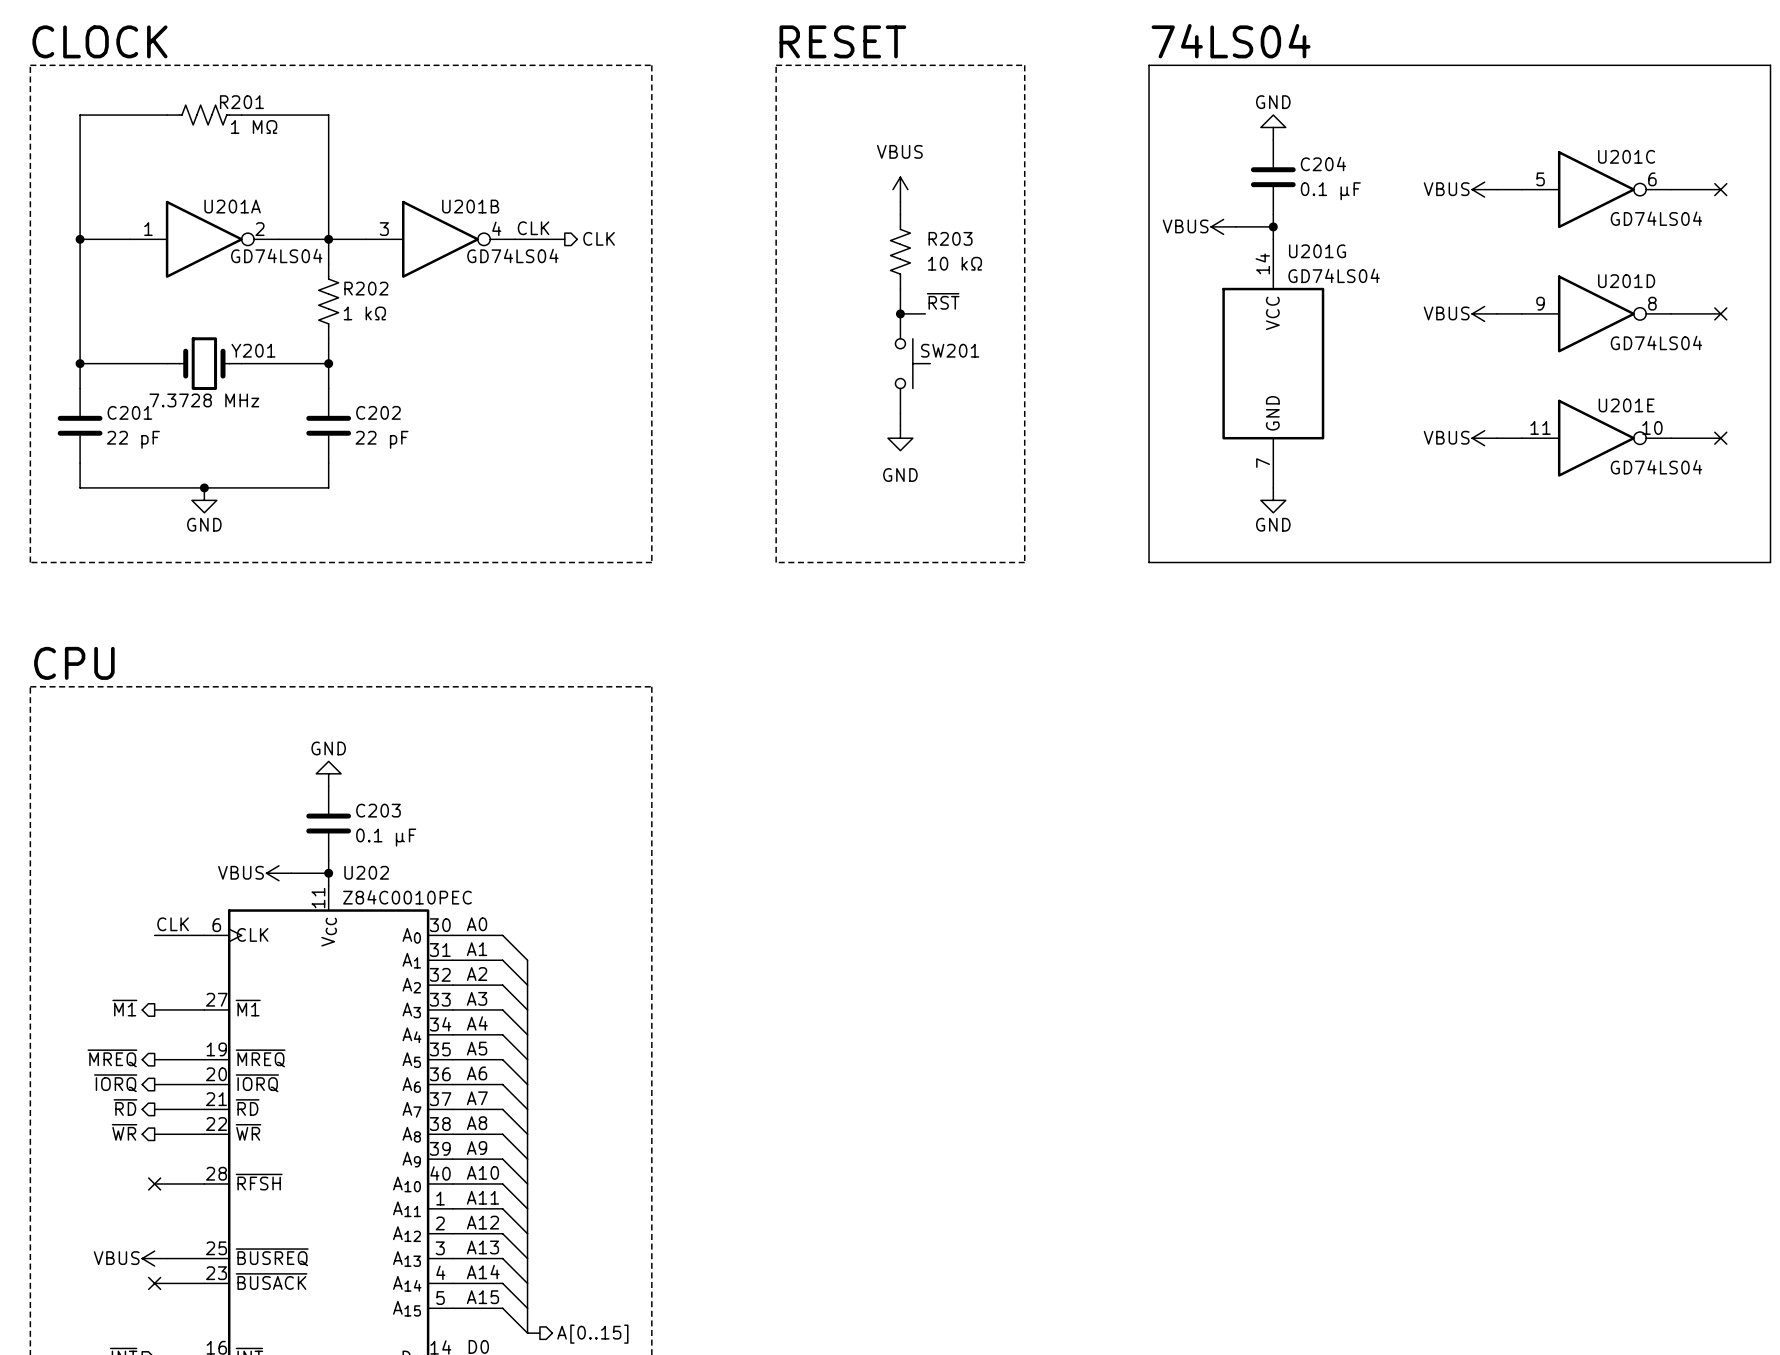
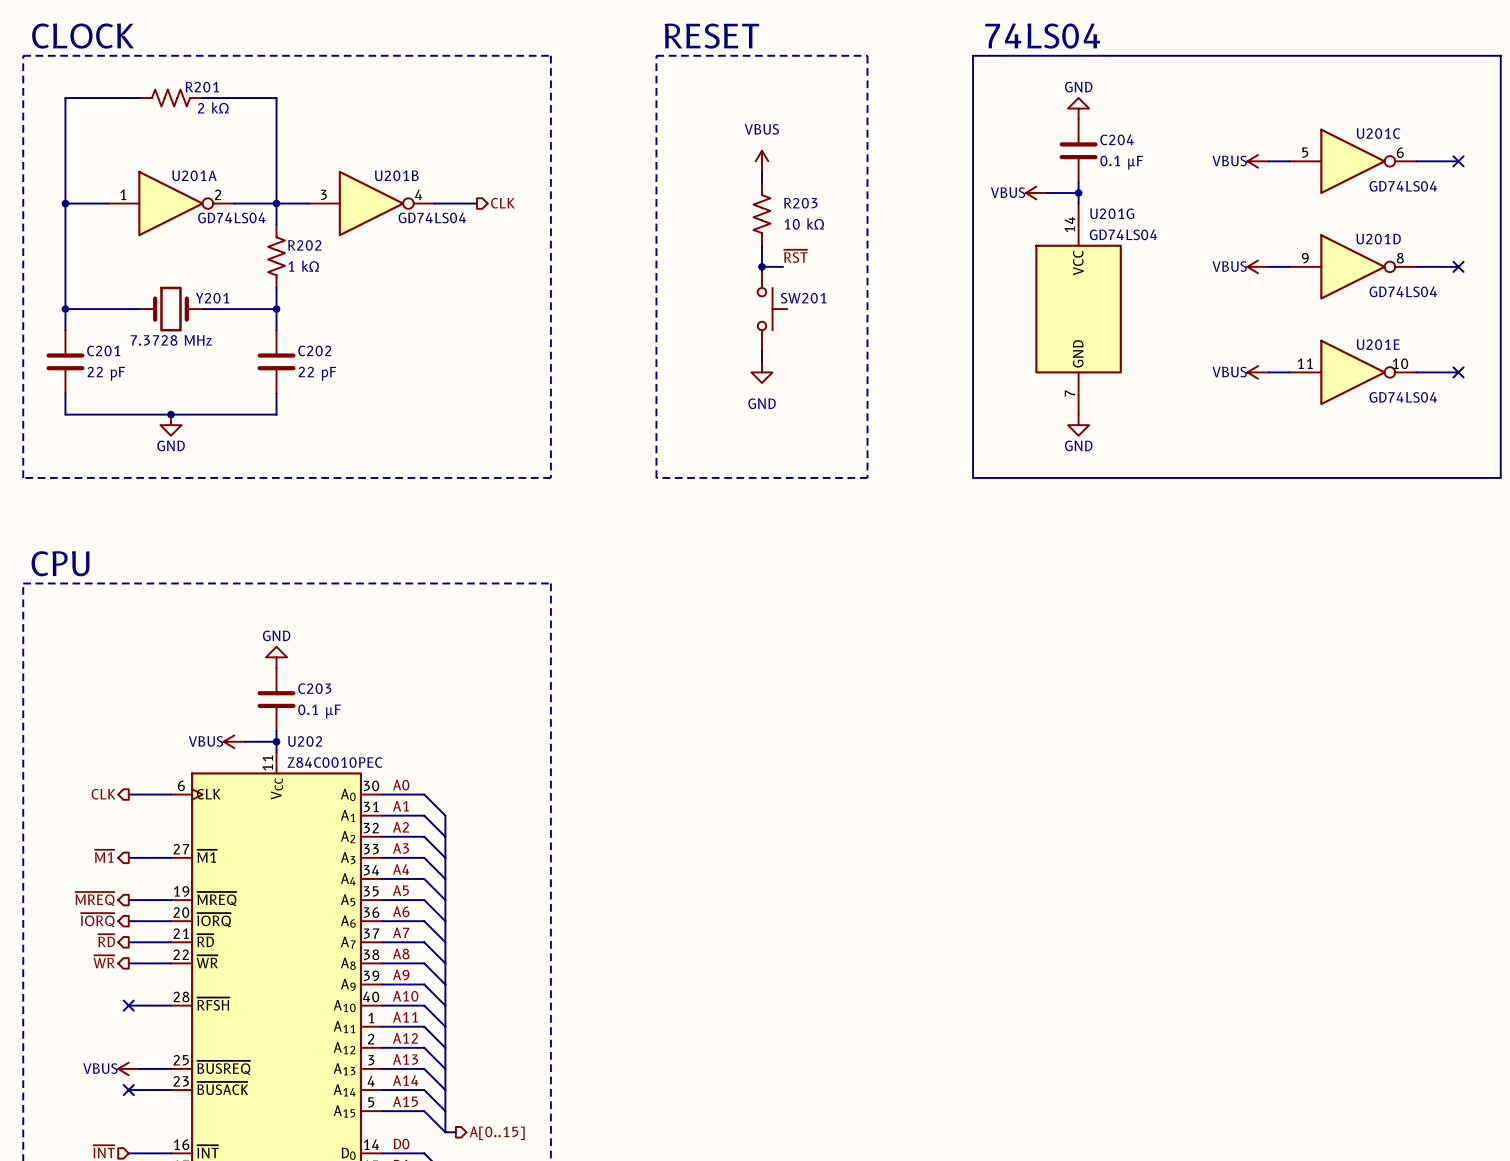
R201 value: 1 MΩ (254, 127) -> 2 kΩ (213, 107)
label: CLK (533, 228) -> none
label: CLK (173, 924) -> none
hierarchical label: none -> CLK (103, 794)

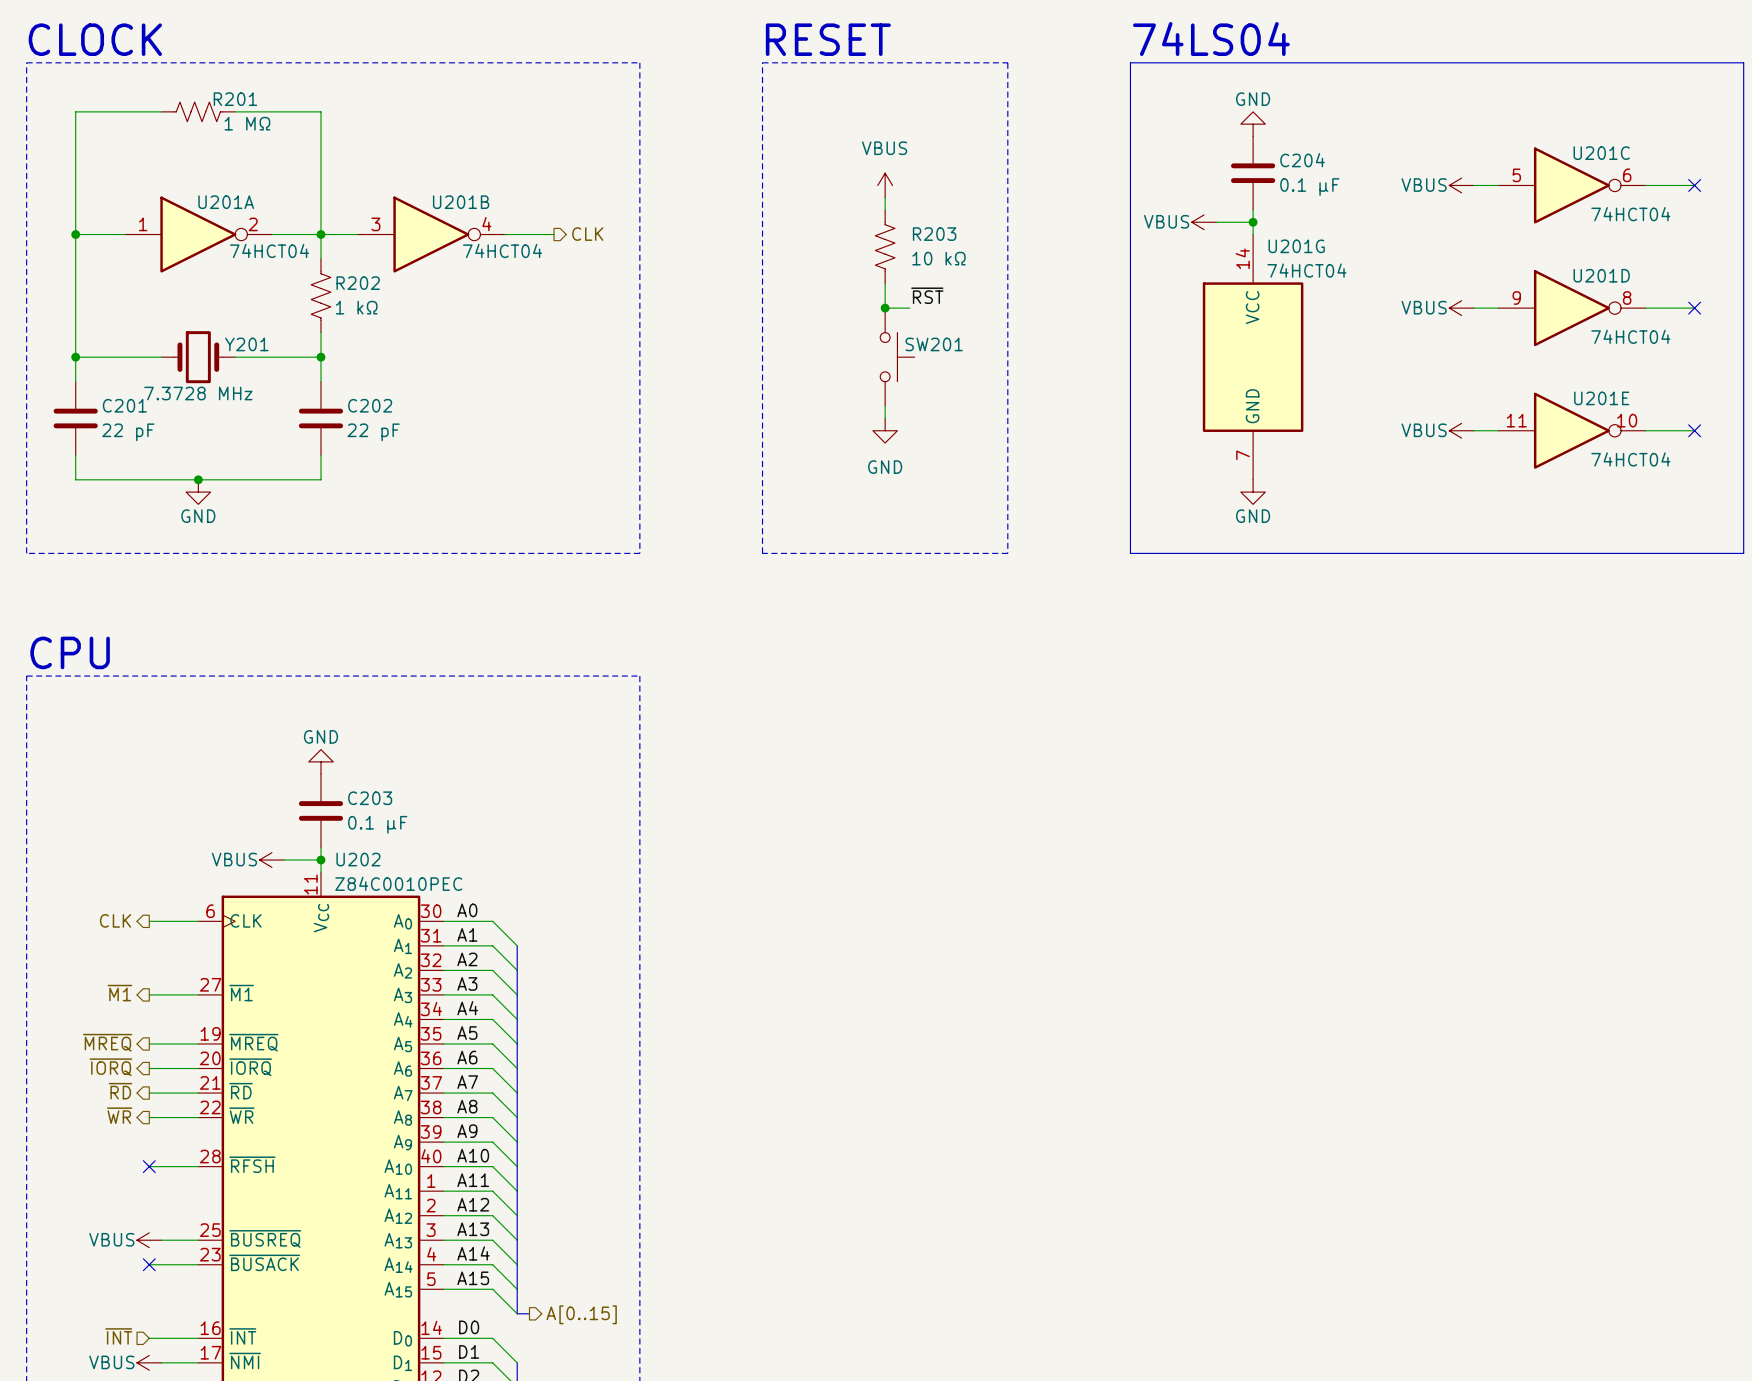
R201 value: 2 kΩ (213, 107) -> 1 MΩ (247, 123)
U201C value: GD74LS04 (1403, 186) -> 74HCT04 (1630, 214)
U201A value: GD74LS04 (231, 217) -> 74HCT04 (269, 250)
U201B value: GD74LS04 (432, 217) -> 74HCT04 (502, 250)
U201G value: GD74LS04 (1123, 234) -> 74HCT04 (1306, 270)
U201D value: GD74LS04 (1403, 291) -> 74HCT04 (1630, 336)
U201E value: GD74LS04 (1403, 397) -> 74HCT04 (1630, 459)

